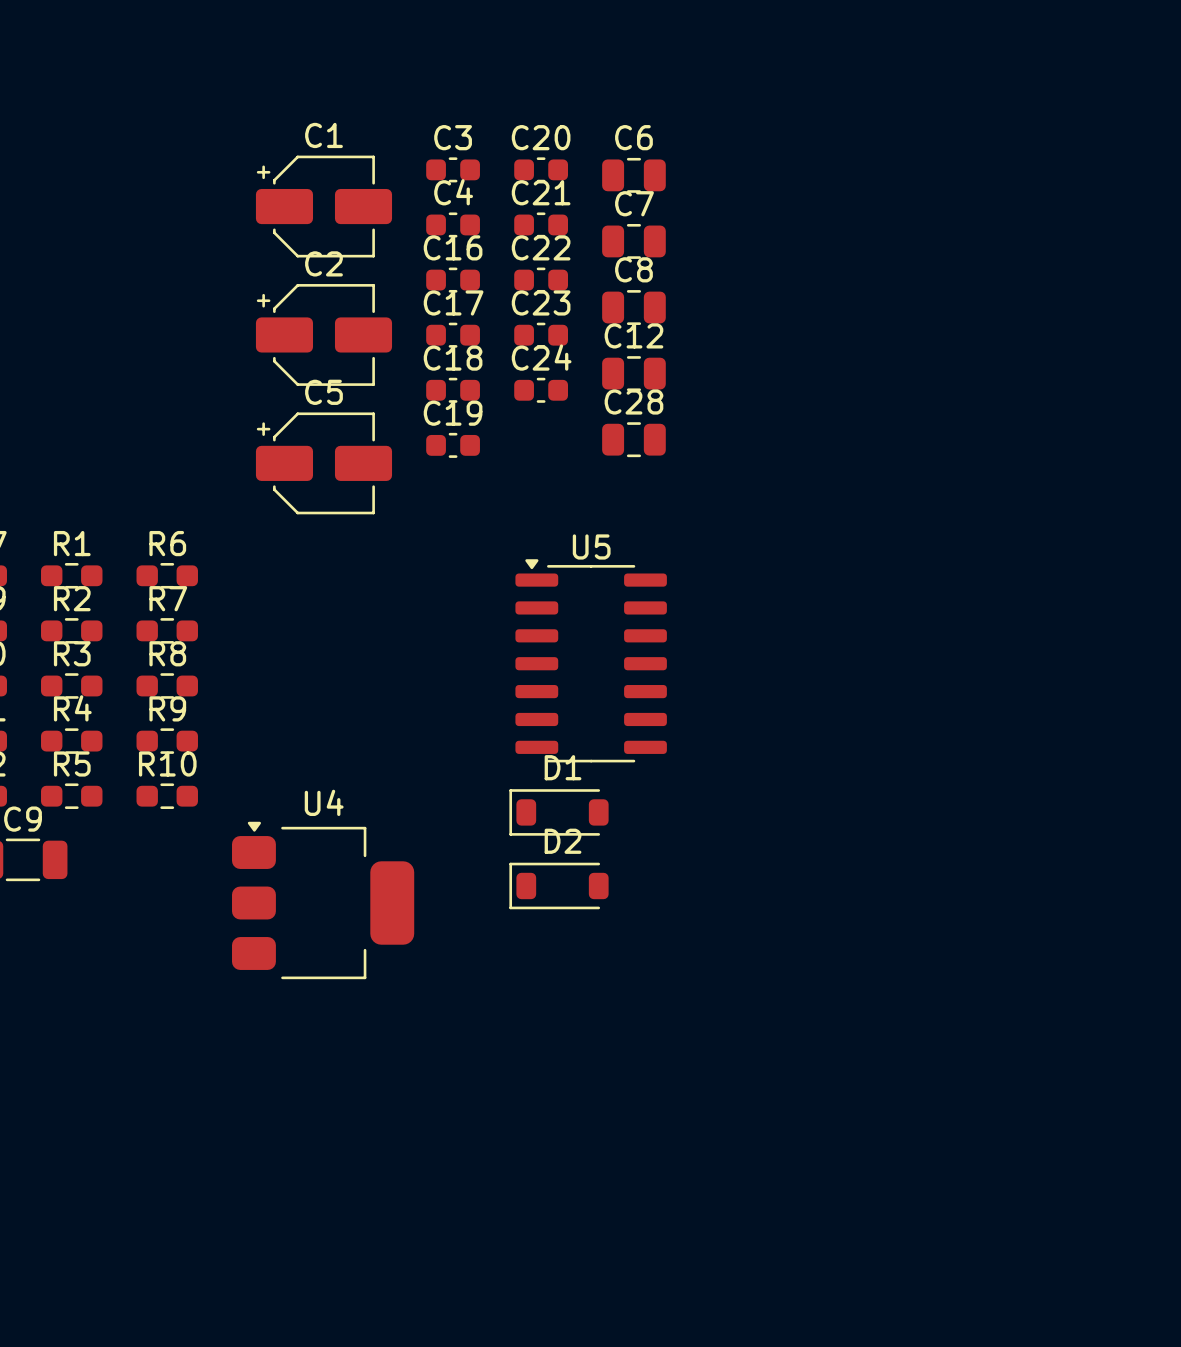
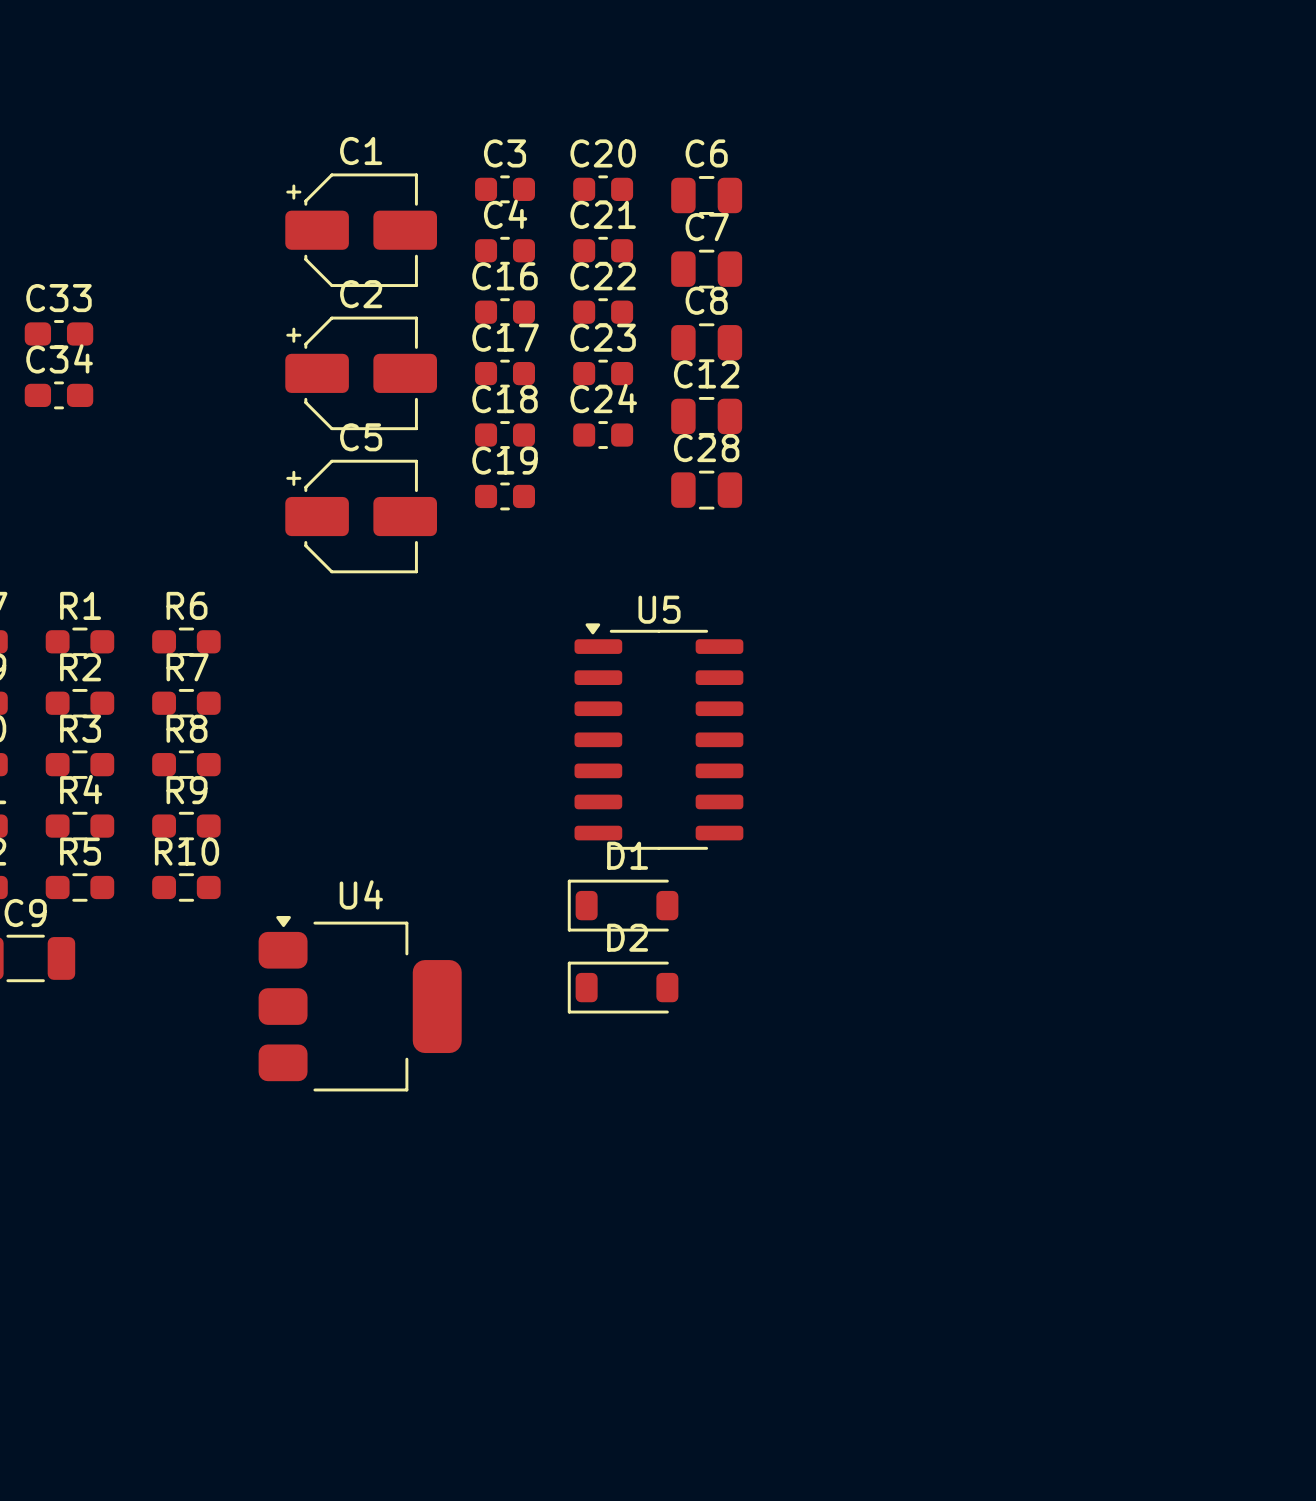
C33: none -> (58, 333)
C34: none -> (58, 395)

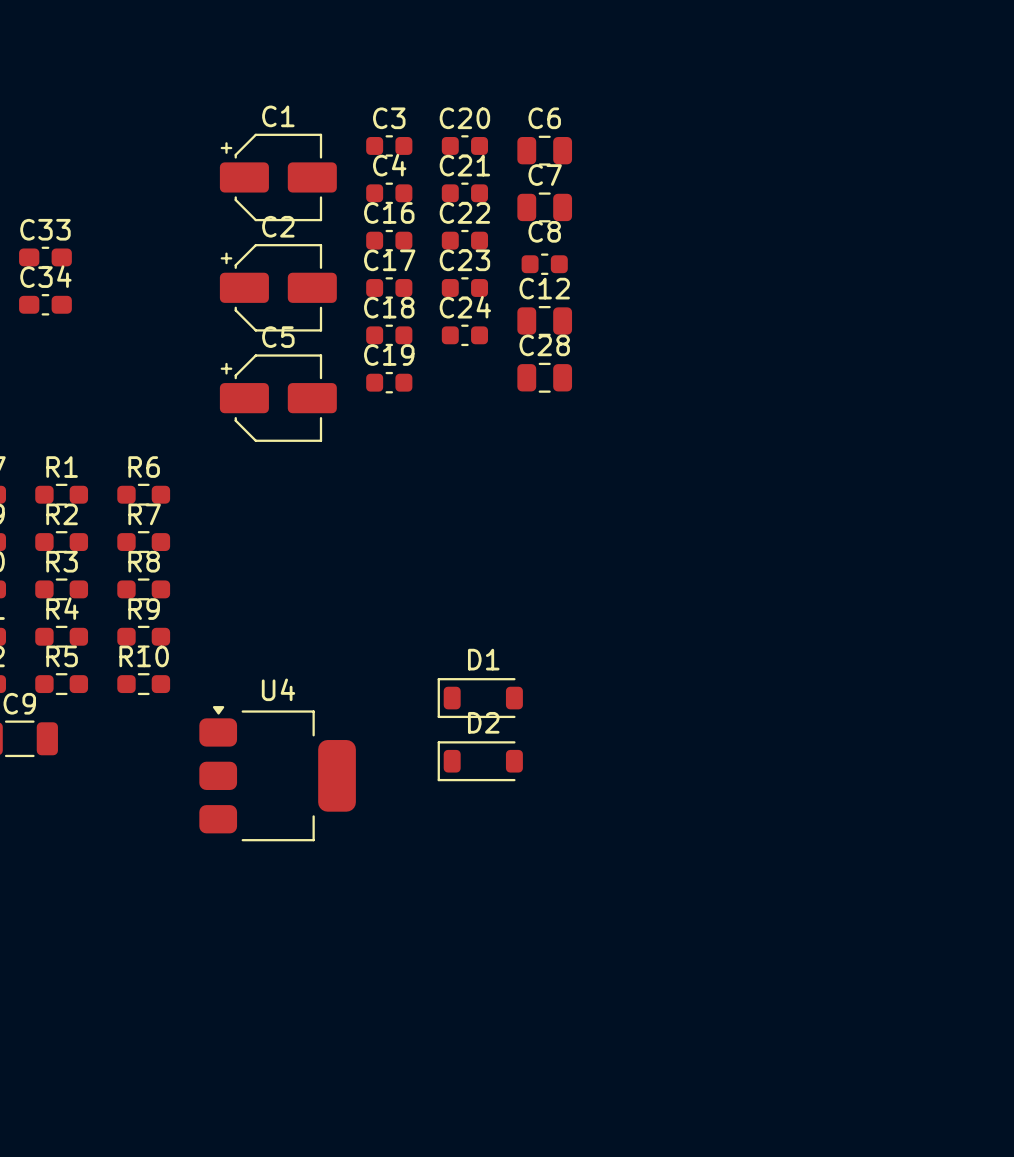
C8 footprint: [671, 323, 743, 363] -> [521, 253, 568, 275]
U5: (658, 736) -> none

